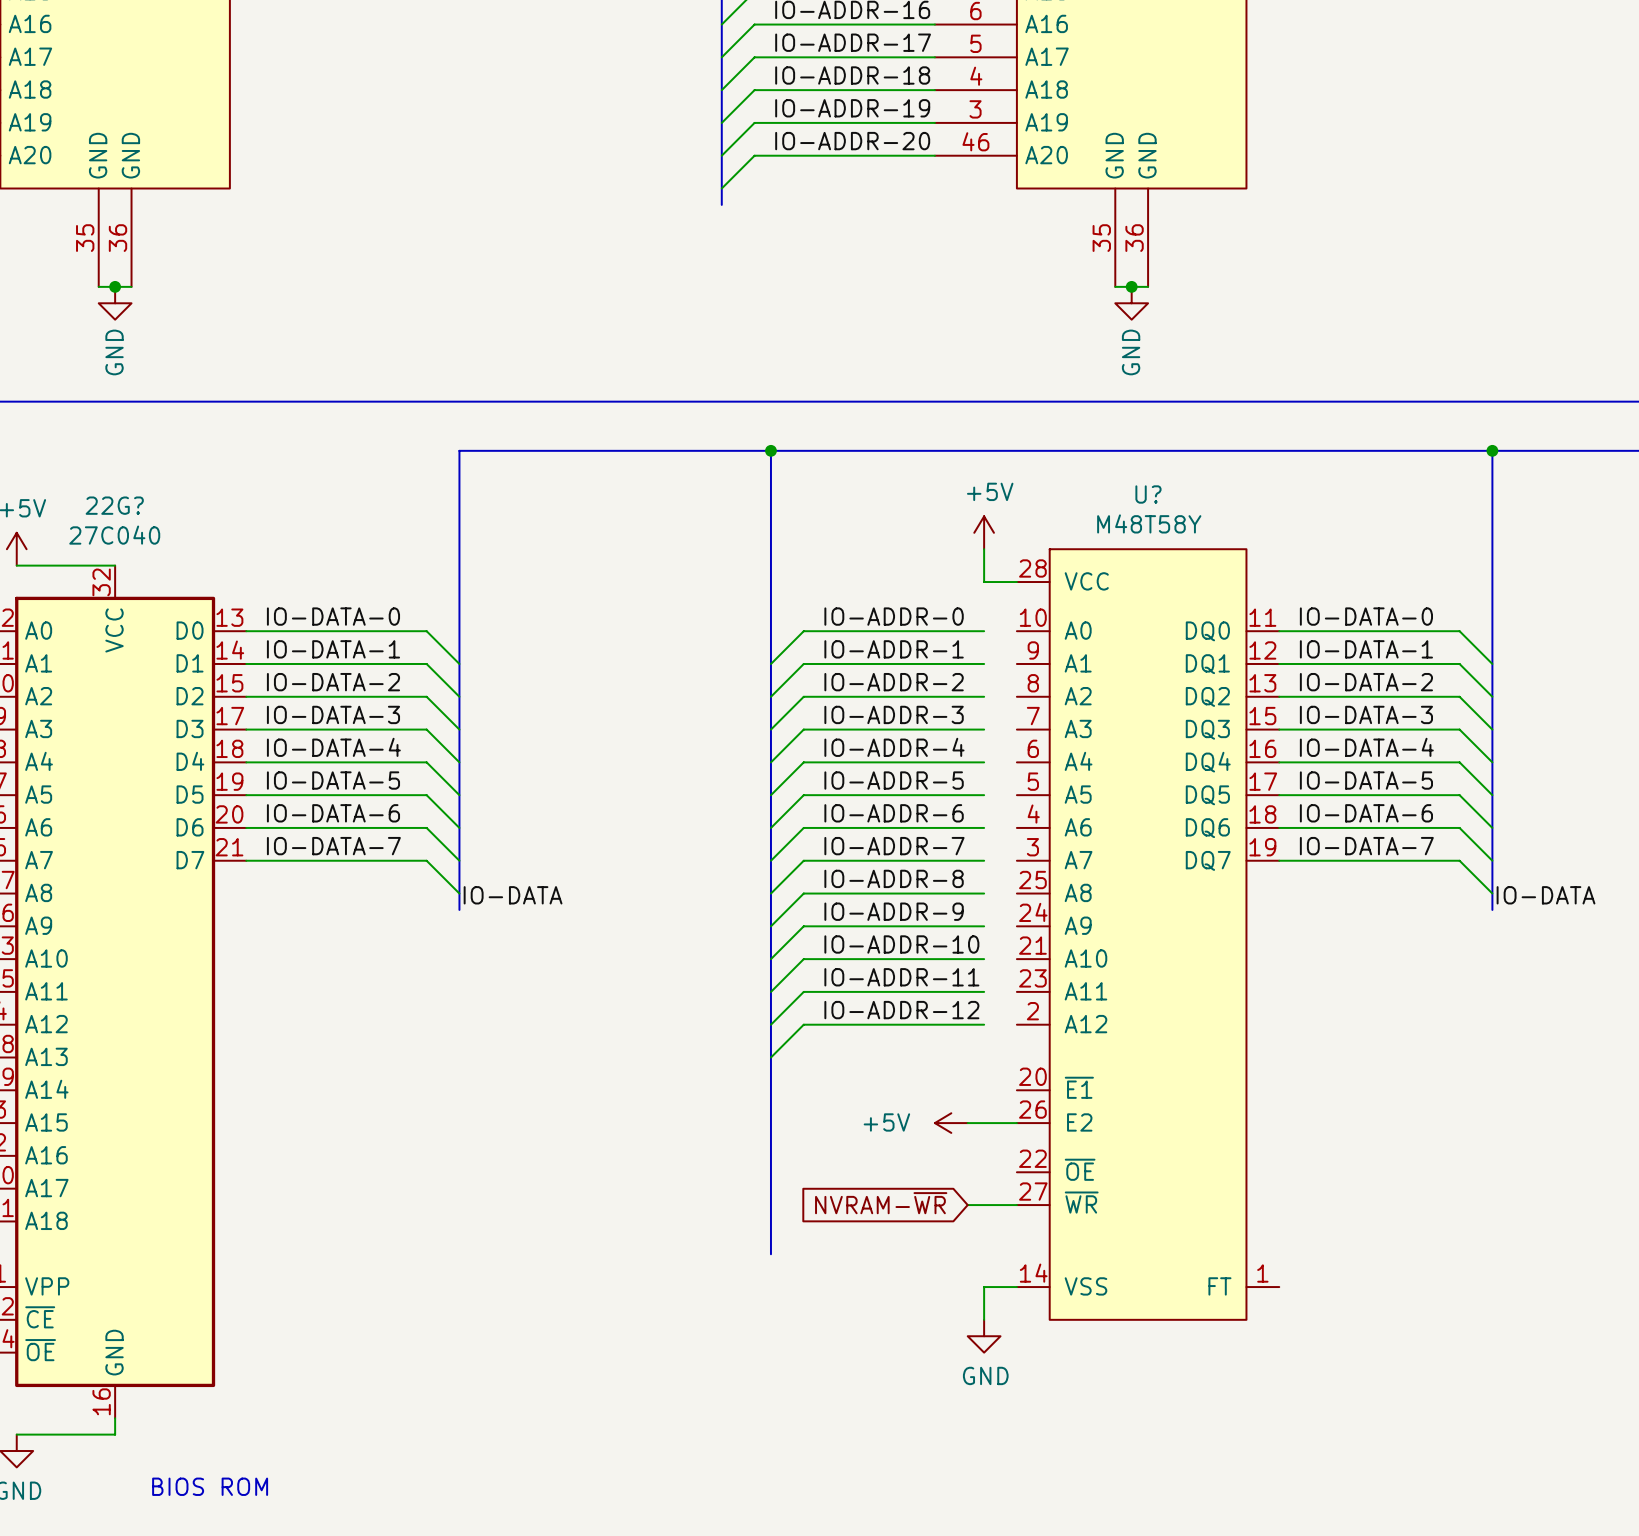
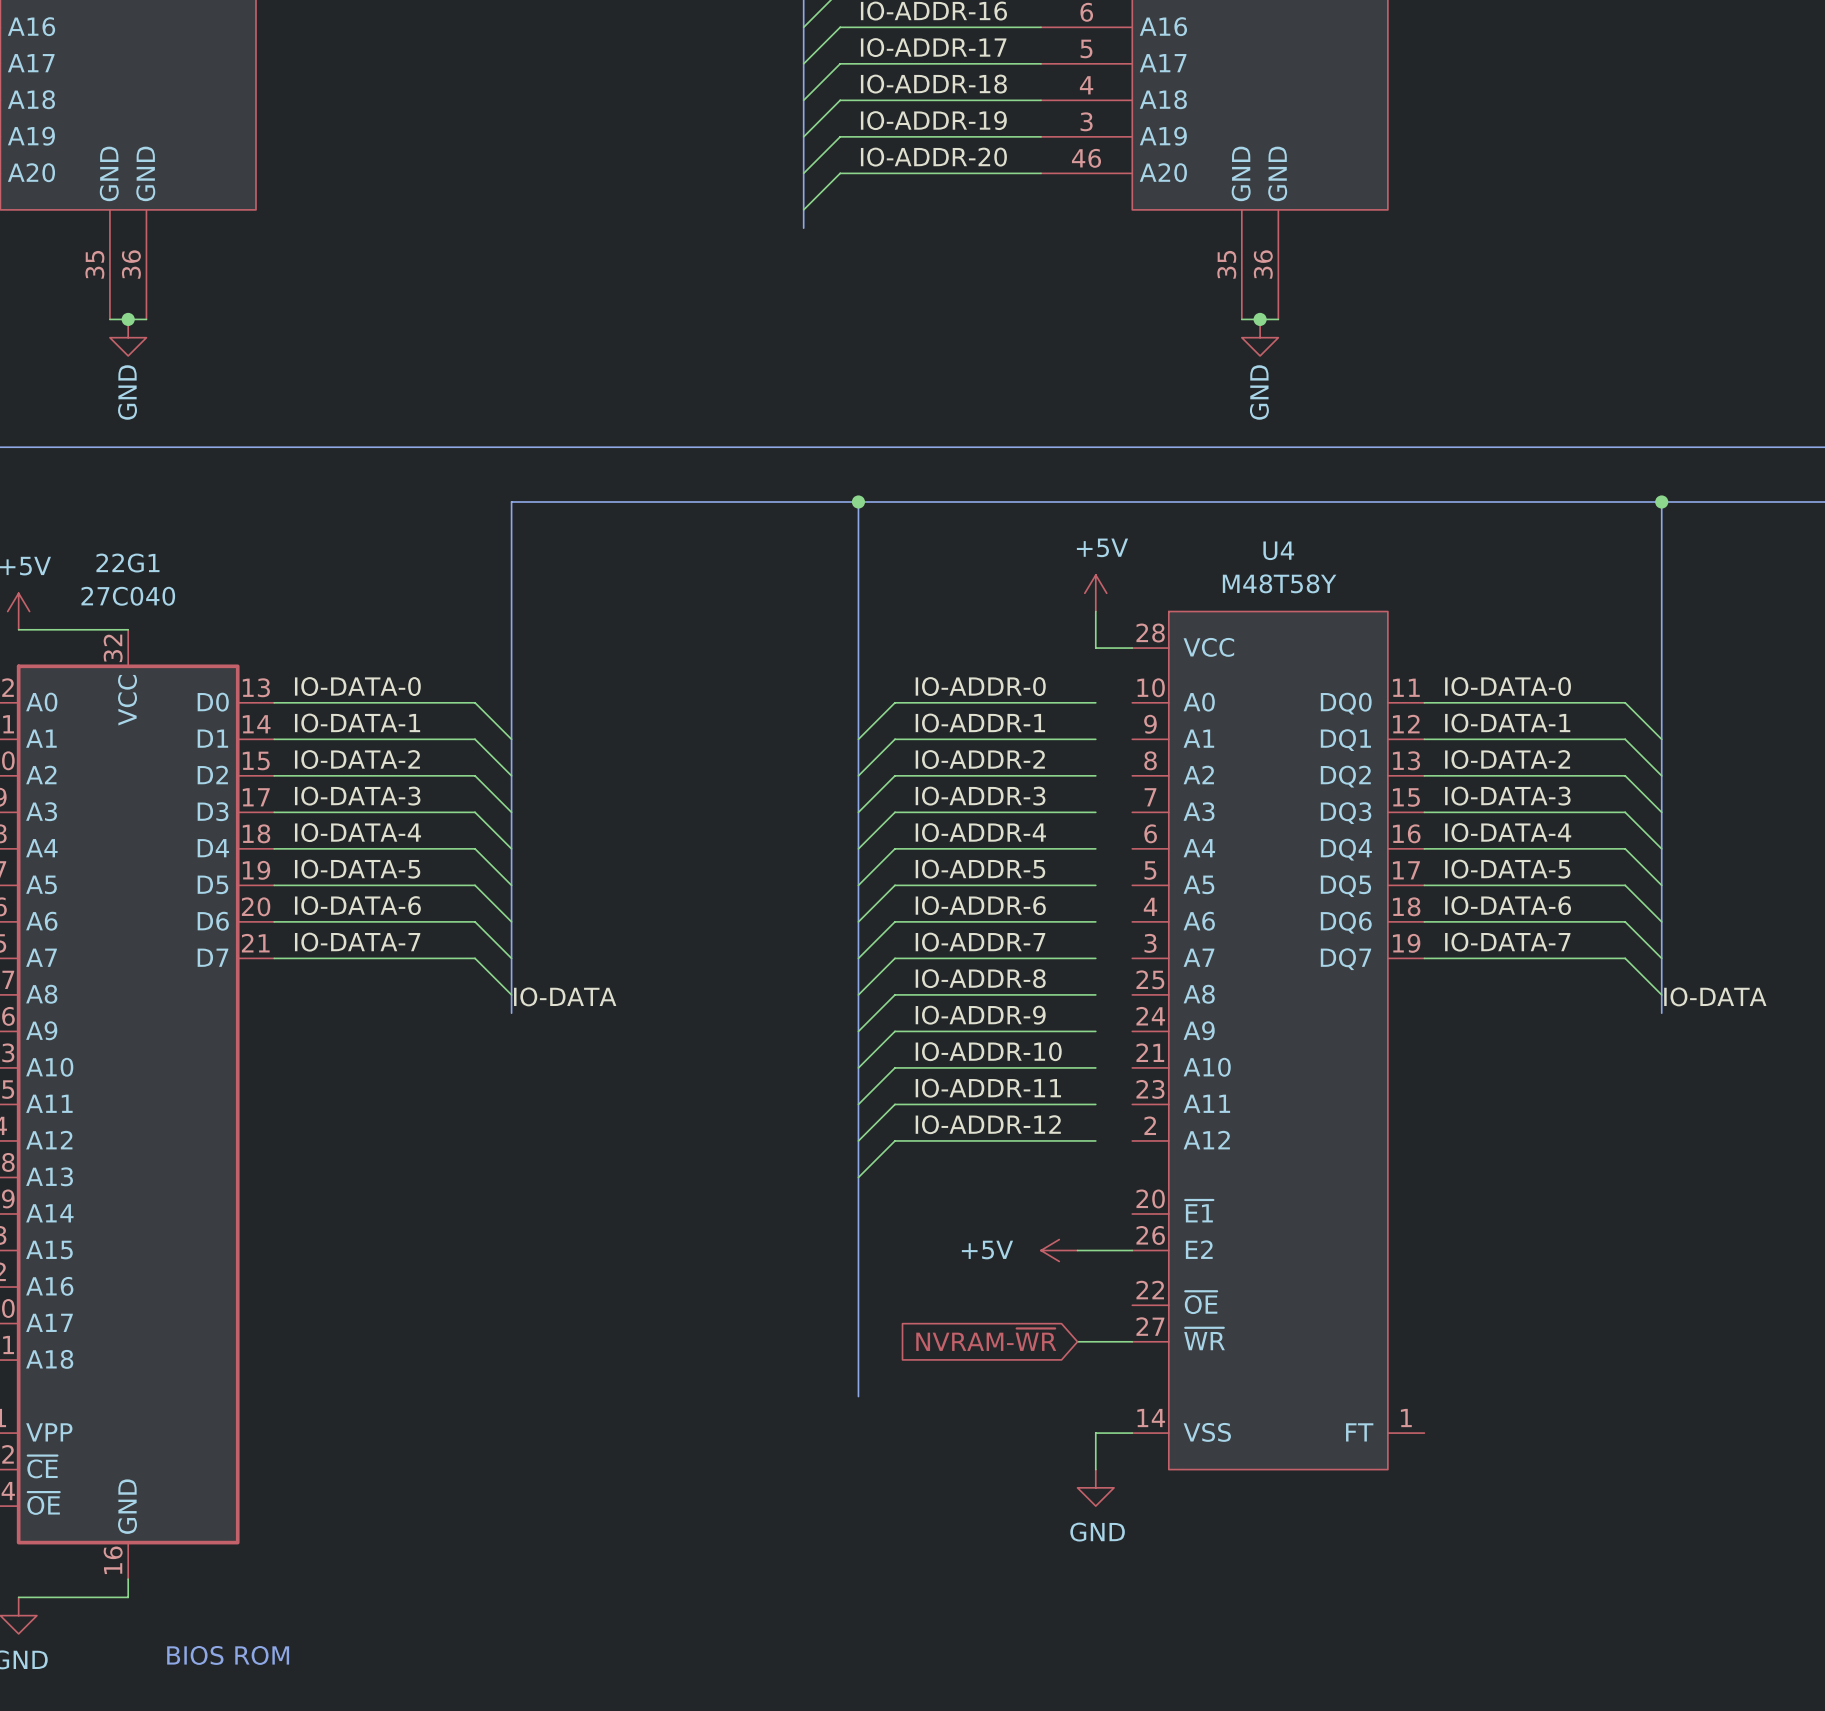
U? name: U? (1148, 494) -> U4 (1278, 550)
22G? name: 22G? (114, 505) -> 22G1 (127, 563)

